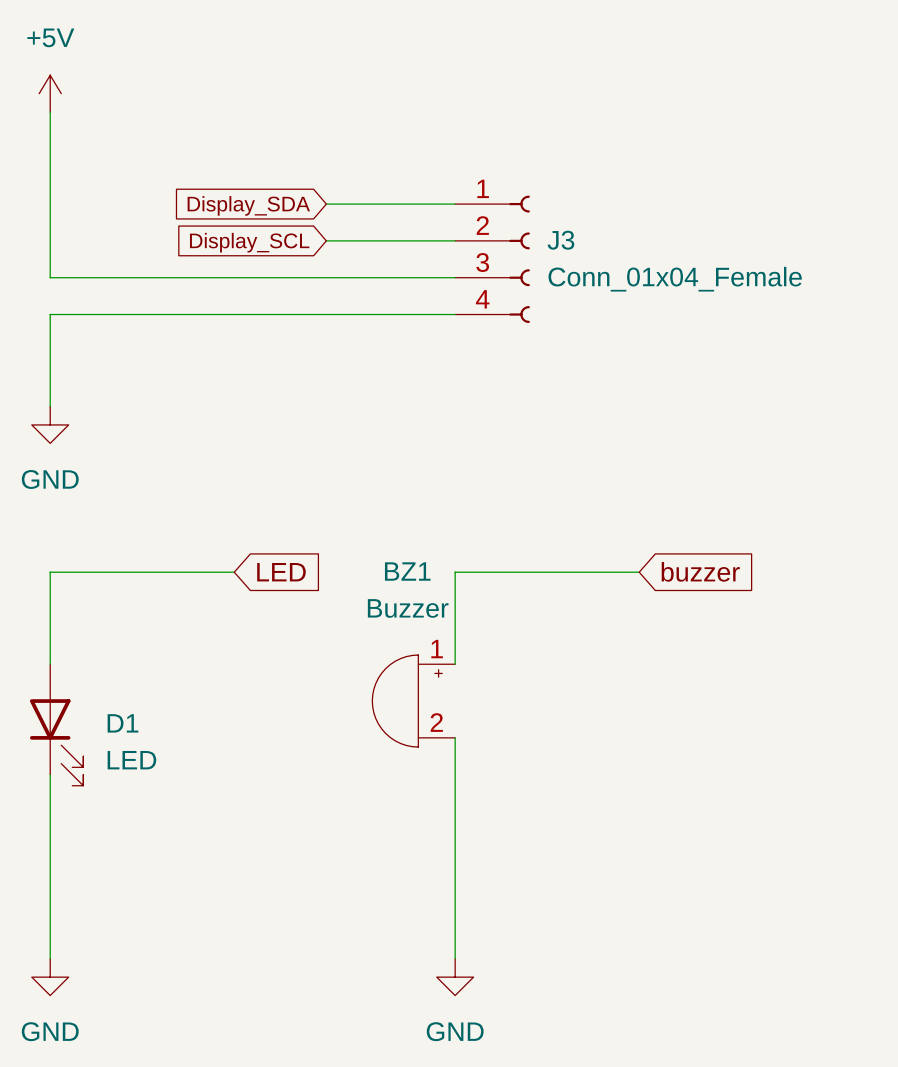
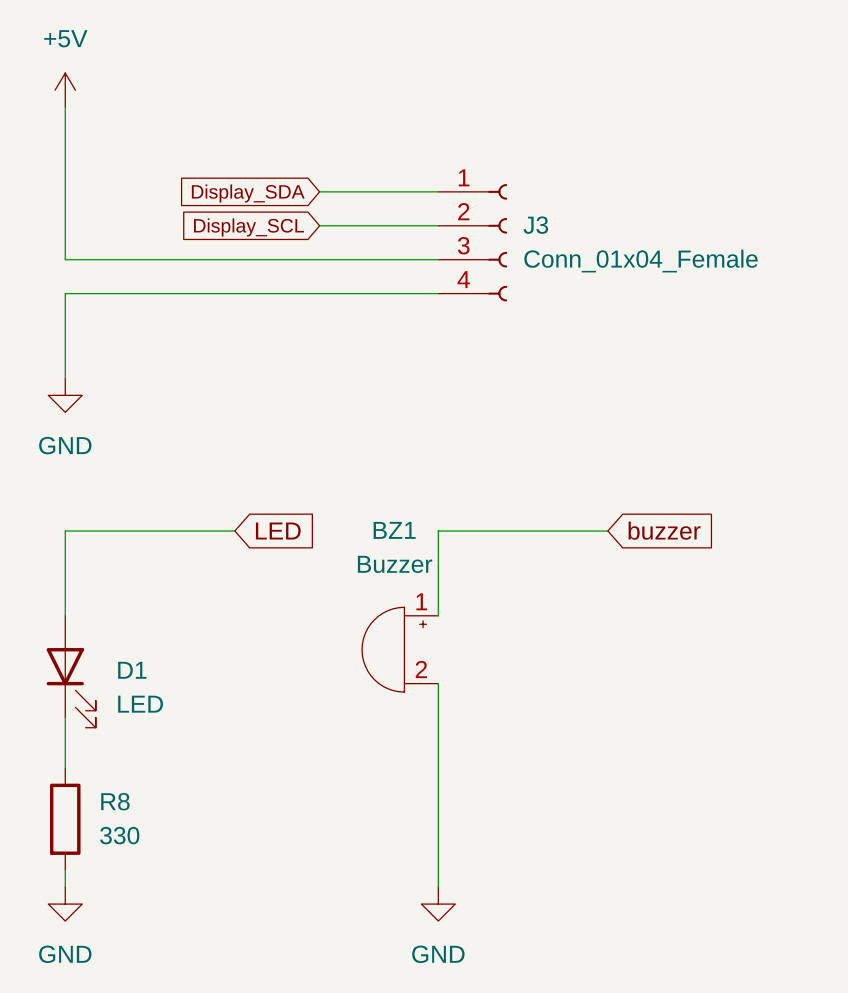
wire: (50, 829) (50, 940) -> none
R8: none -> 330 (65, 819)

